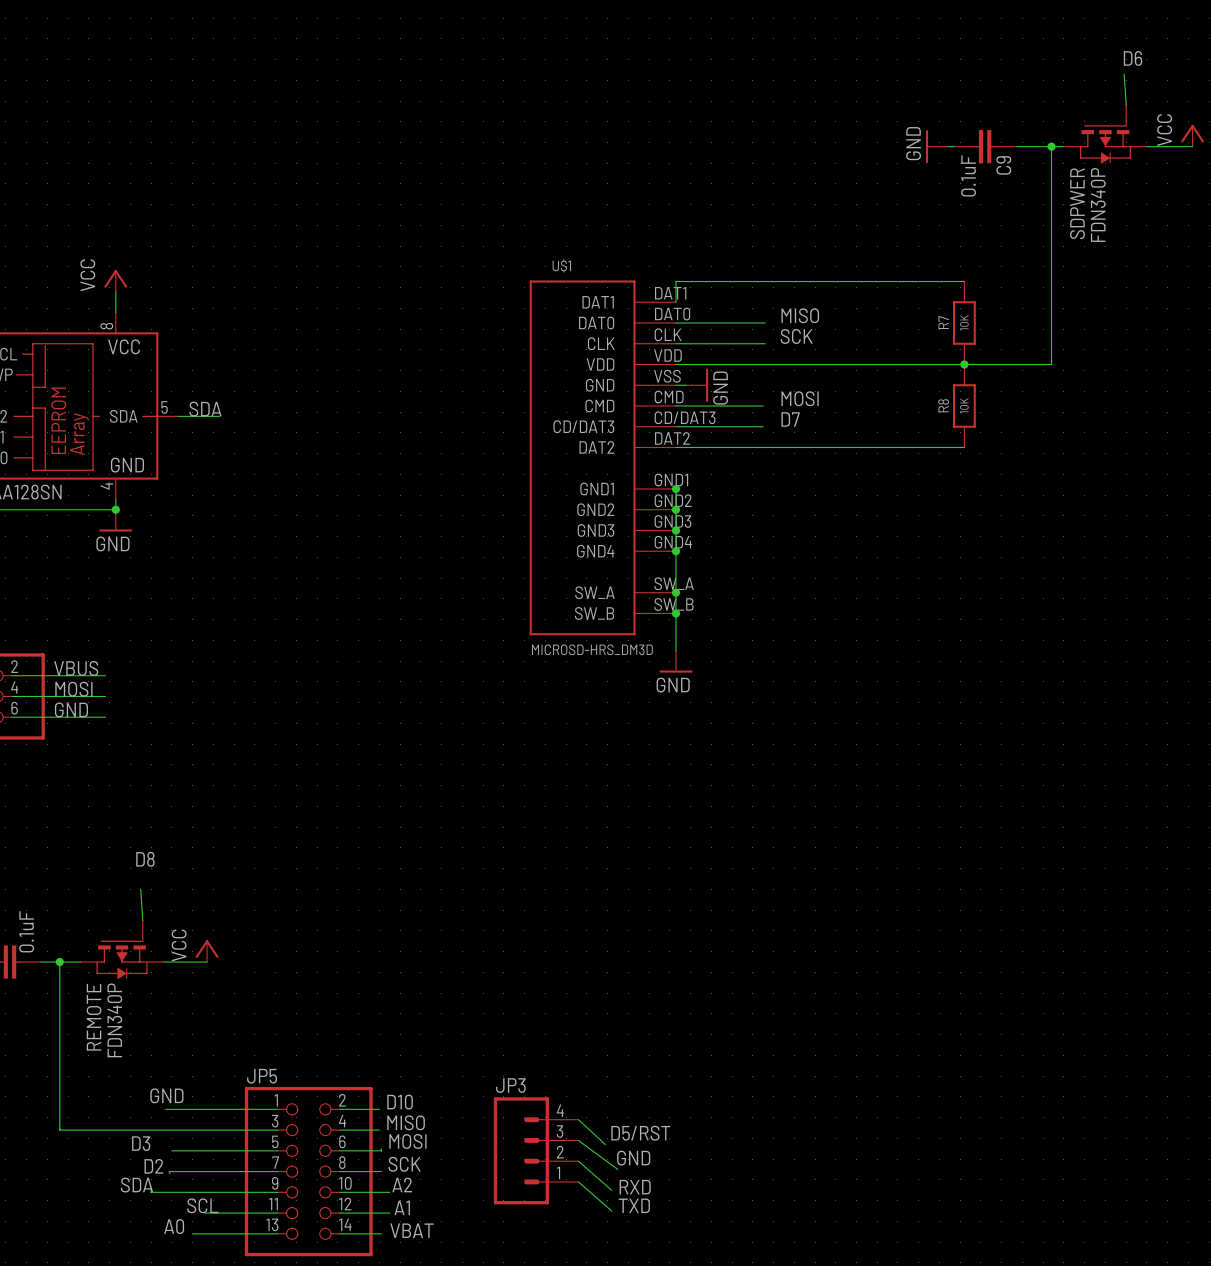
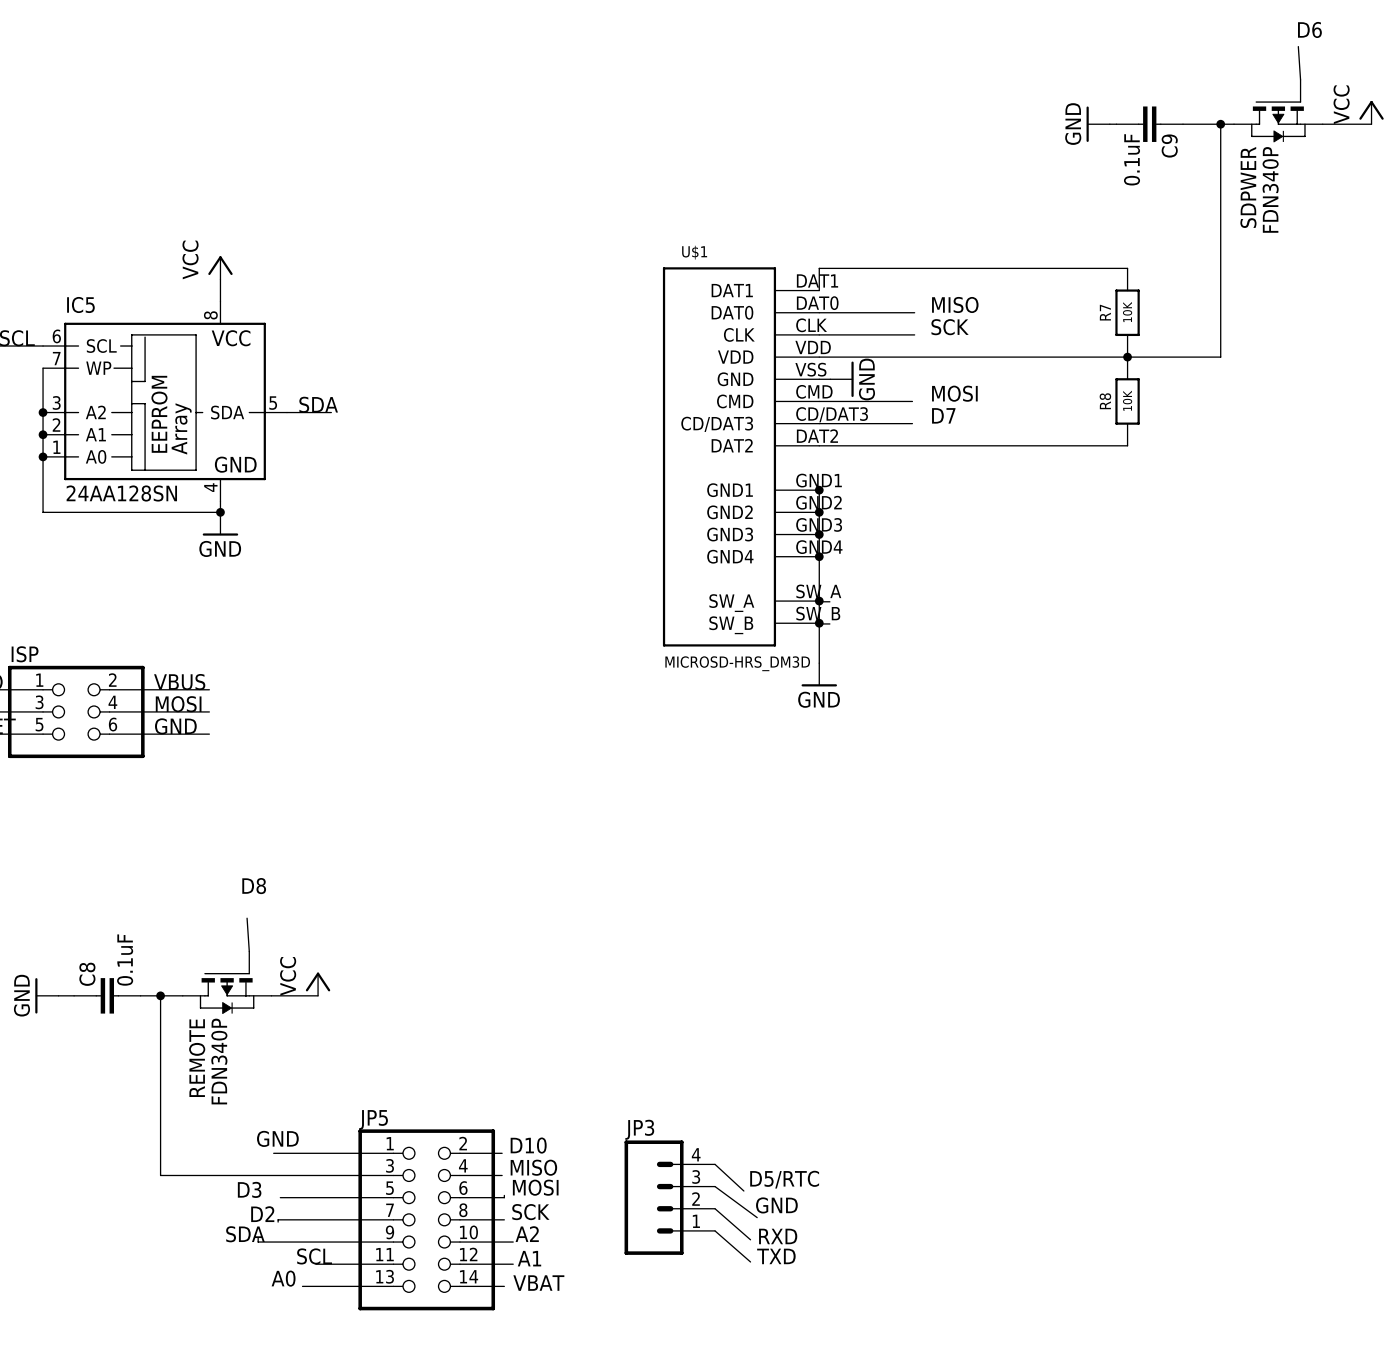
label: D5/RST (640, 1133) -> D5/RTC (784, 1179)

